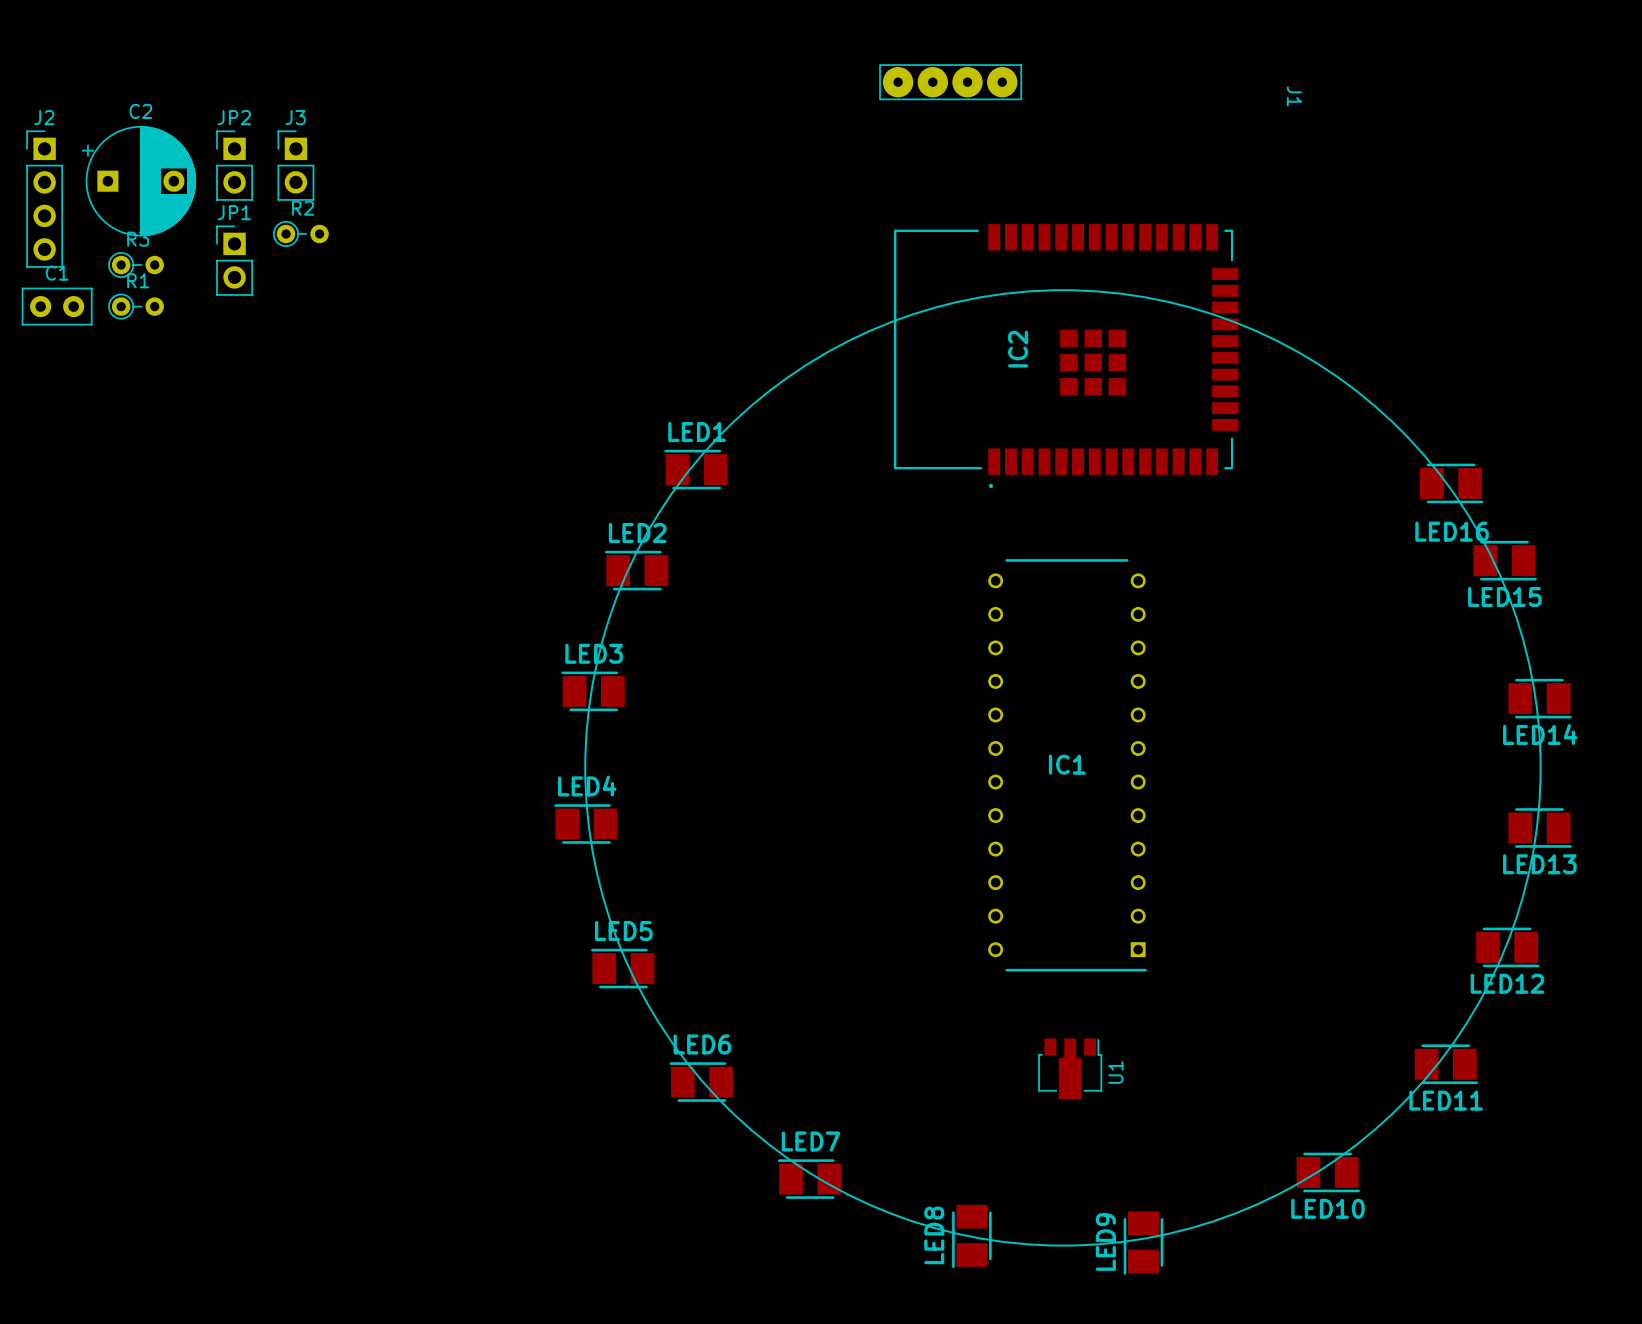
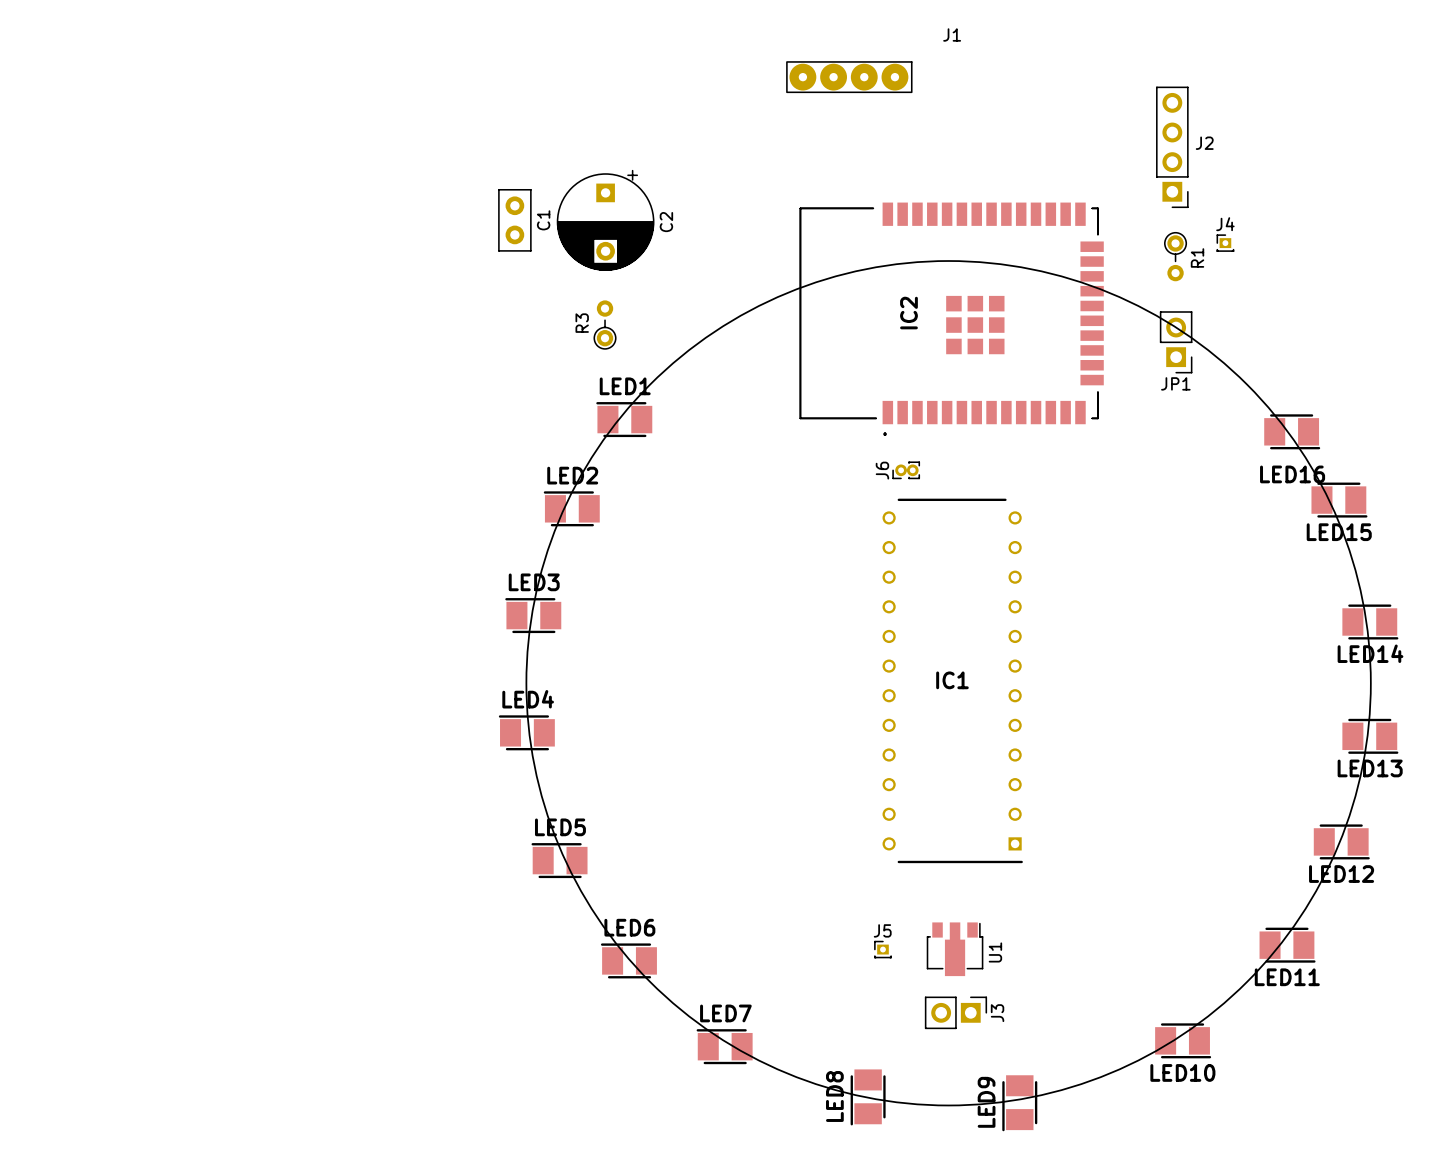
J1 name rotation: 0° (1294, 96) -> 90° counterclockwise (952, 34)
J1 name position: J1 (1294, 96) -> J1 (952, 34)
J2 name position: J2 (44, 117) -> J2 (1204, 143)
JP2: (234, 165) -> none
J3 rotation: 0° (295, 165) -> 90° clockwise (955, 1012)
J3 position: (295, 165) -> (955, 1012)
C2 rotation: 0° (138, 181) -> 90° clockwise (605, 220)
C2 position: (138, 181) -> (605, 220)
J2 rotation: 0° (44, 199) -> 180° (1172, 147)
J2 position: (44, 199) -> (1172, 147)
R2: (300, 233) -> none
JP1 rotation: 0° (234, 260) -> 180° (1176, 342)
JP1 position: (234, 260) -> (1176, 342)
R3 rotation: 0° (136, 265) -> 90° counterclockwise (605, 325)
R3 position: (136, 265) -> (605, 325)
J4: none -> (1225, 243)
C1 rotation: 0° (57, 306) -> 90° clockwise (514, 220)
C1 position: (57, 306) -> (514, 220)
R1 rotation: 0° (136, 306) -> 90° clockwise (1175, 256)
R1 position: (136, 306) -> (1175, 256)
J6: none -> (906, 470)
J5: none -> (882, 949)

